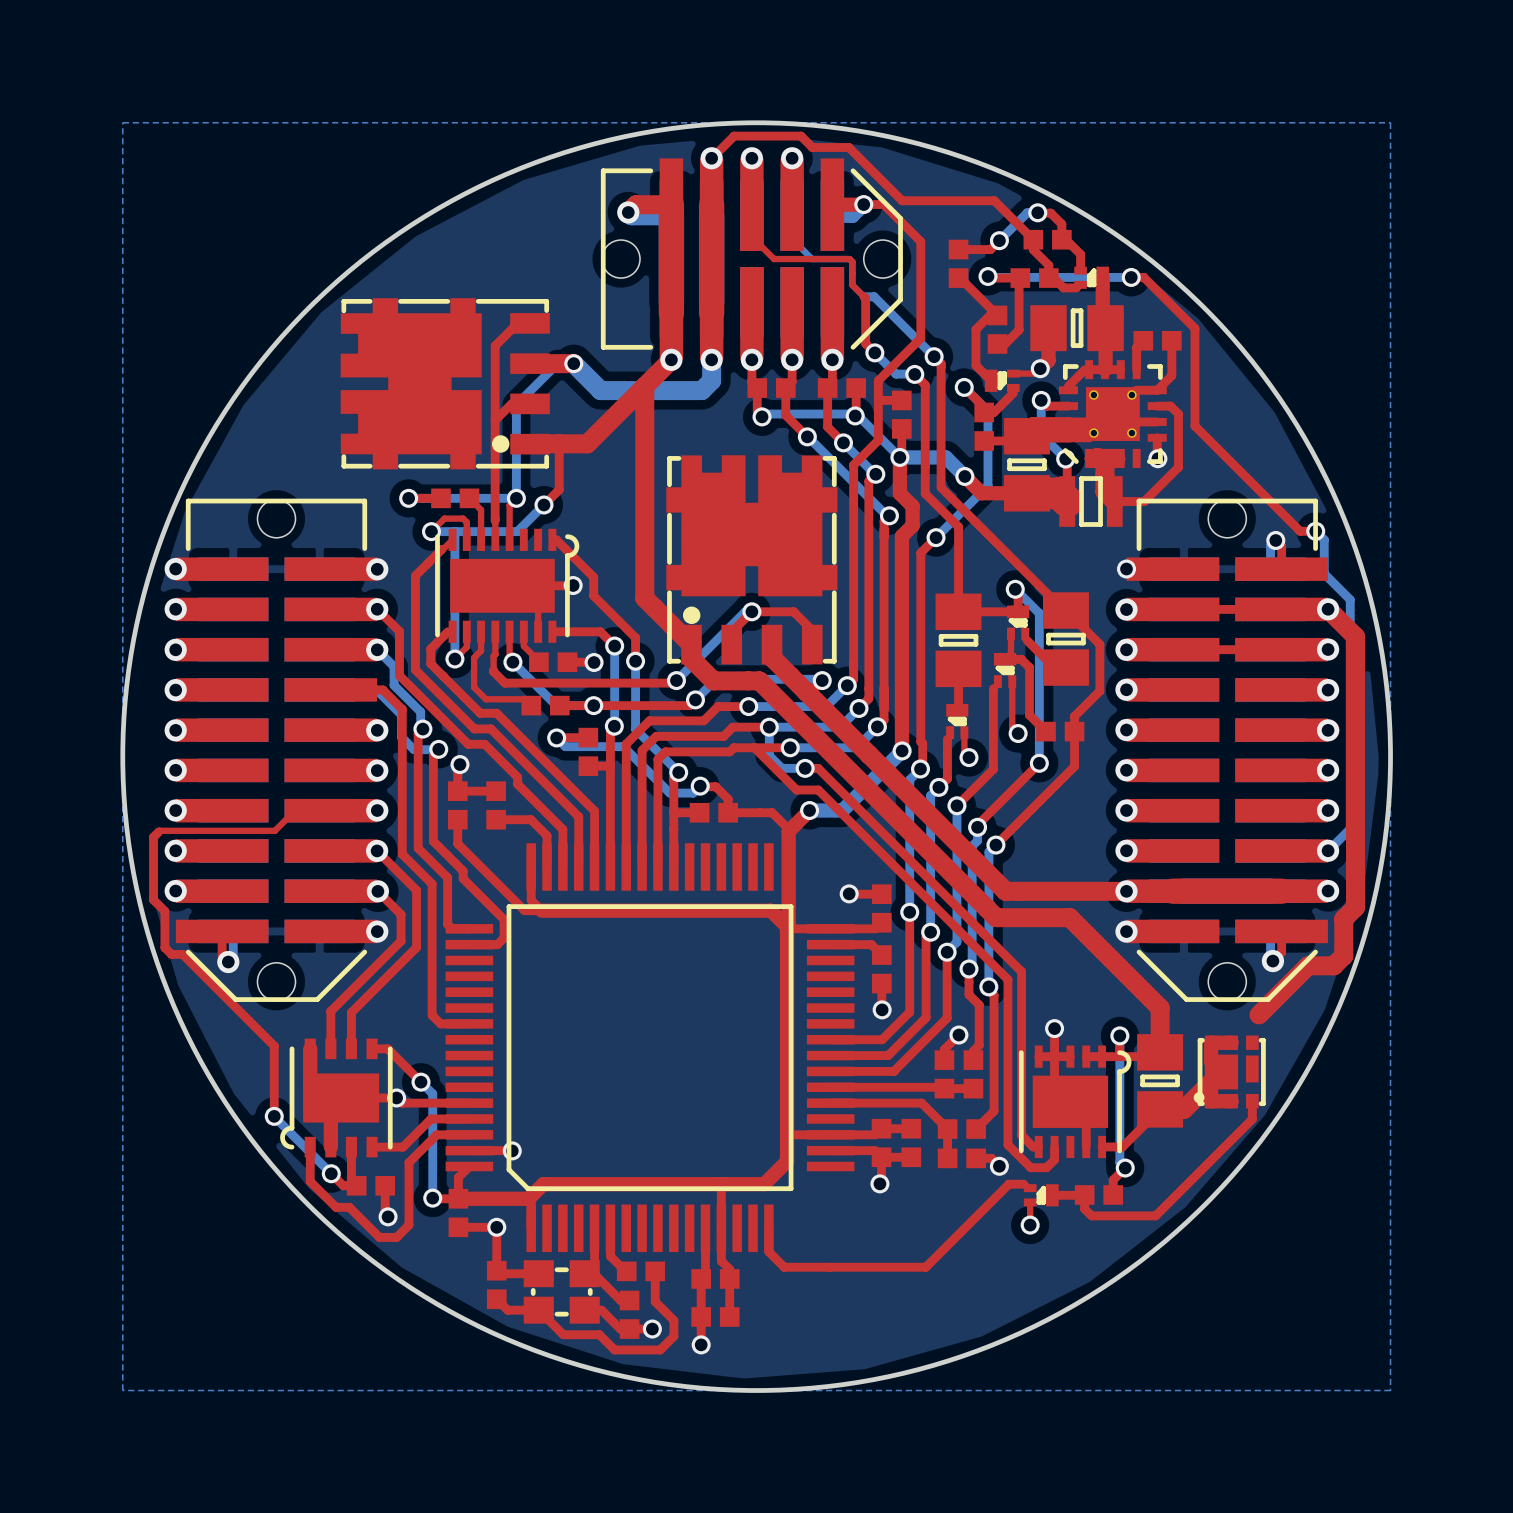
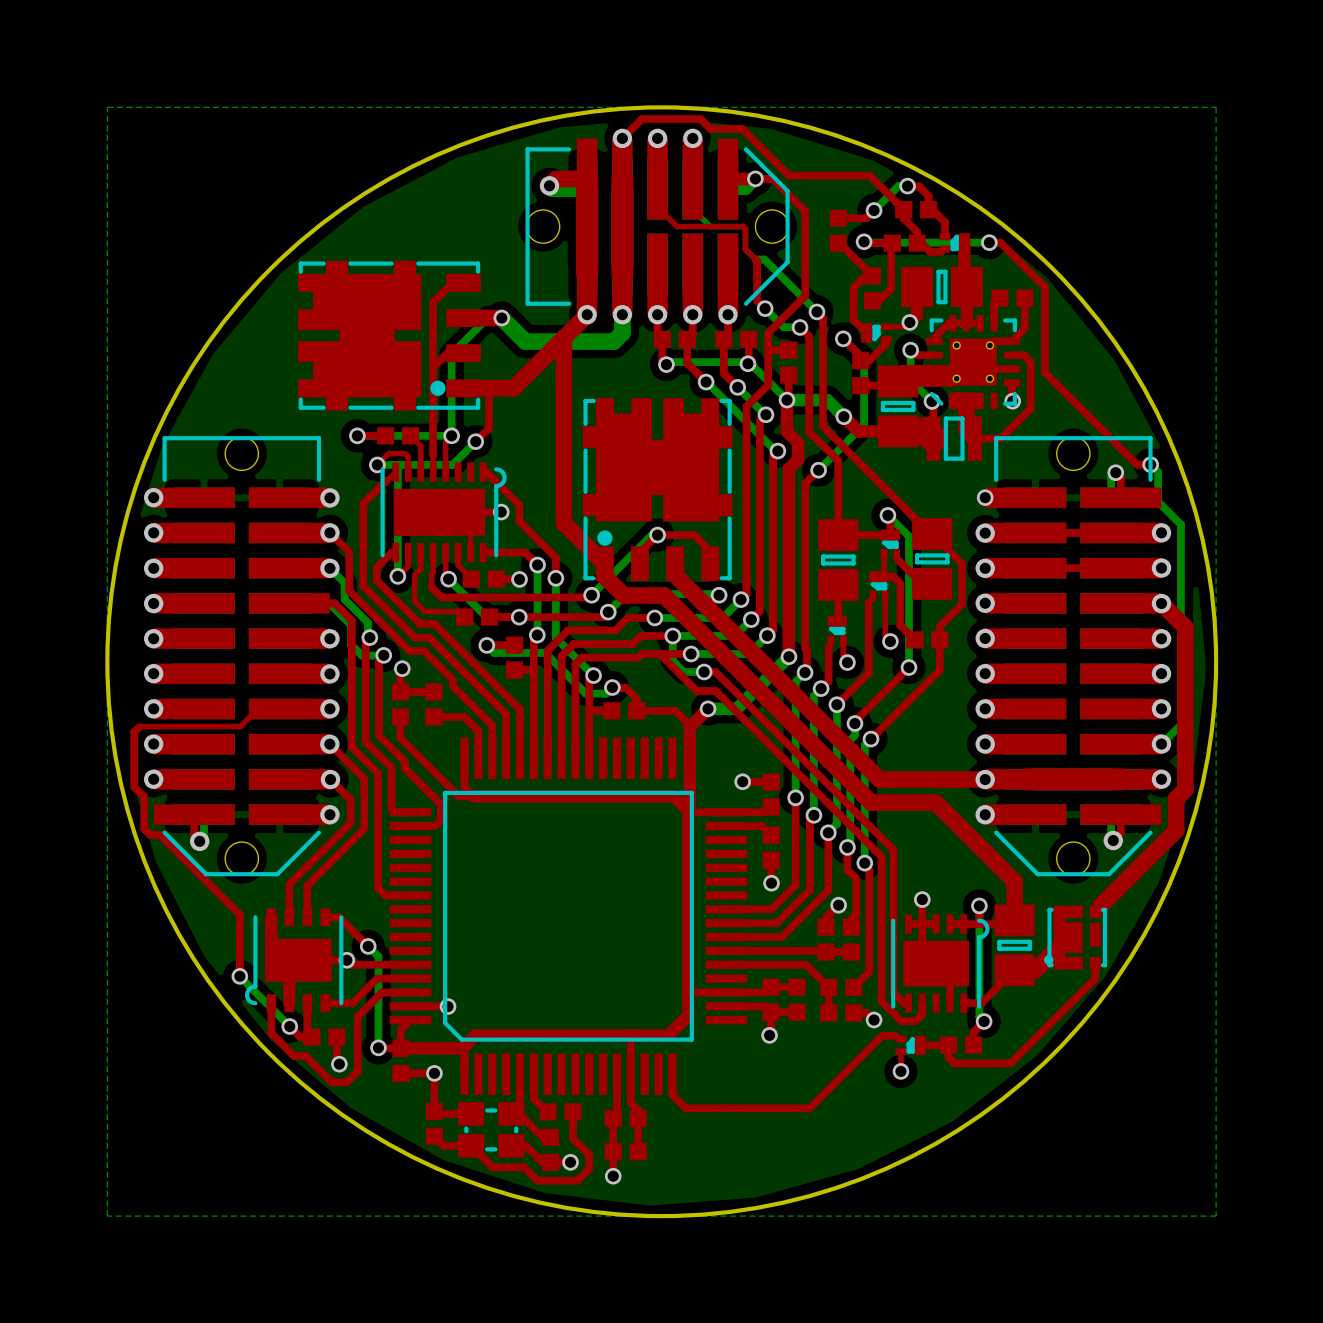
top track: (1328, 609) (1355, 636) (1355, 907) (1343, 919) (1343, 955) (1333, 965) (1308, 965) (1258, 1014) -> none
top track: none -> (1161, 603) (1185, 627) (1185, 789) (1176, 798) (1176, 830) (1100, 905)

